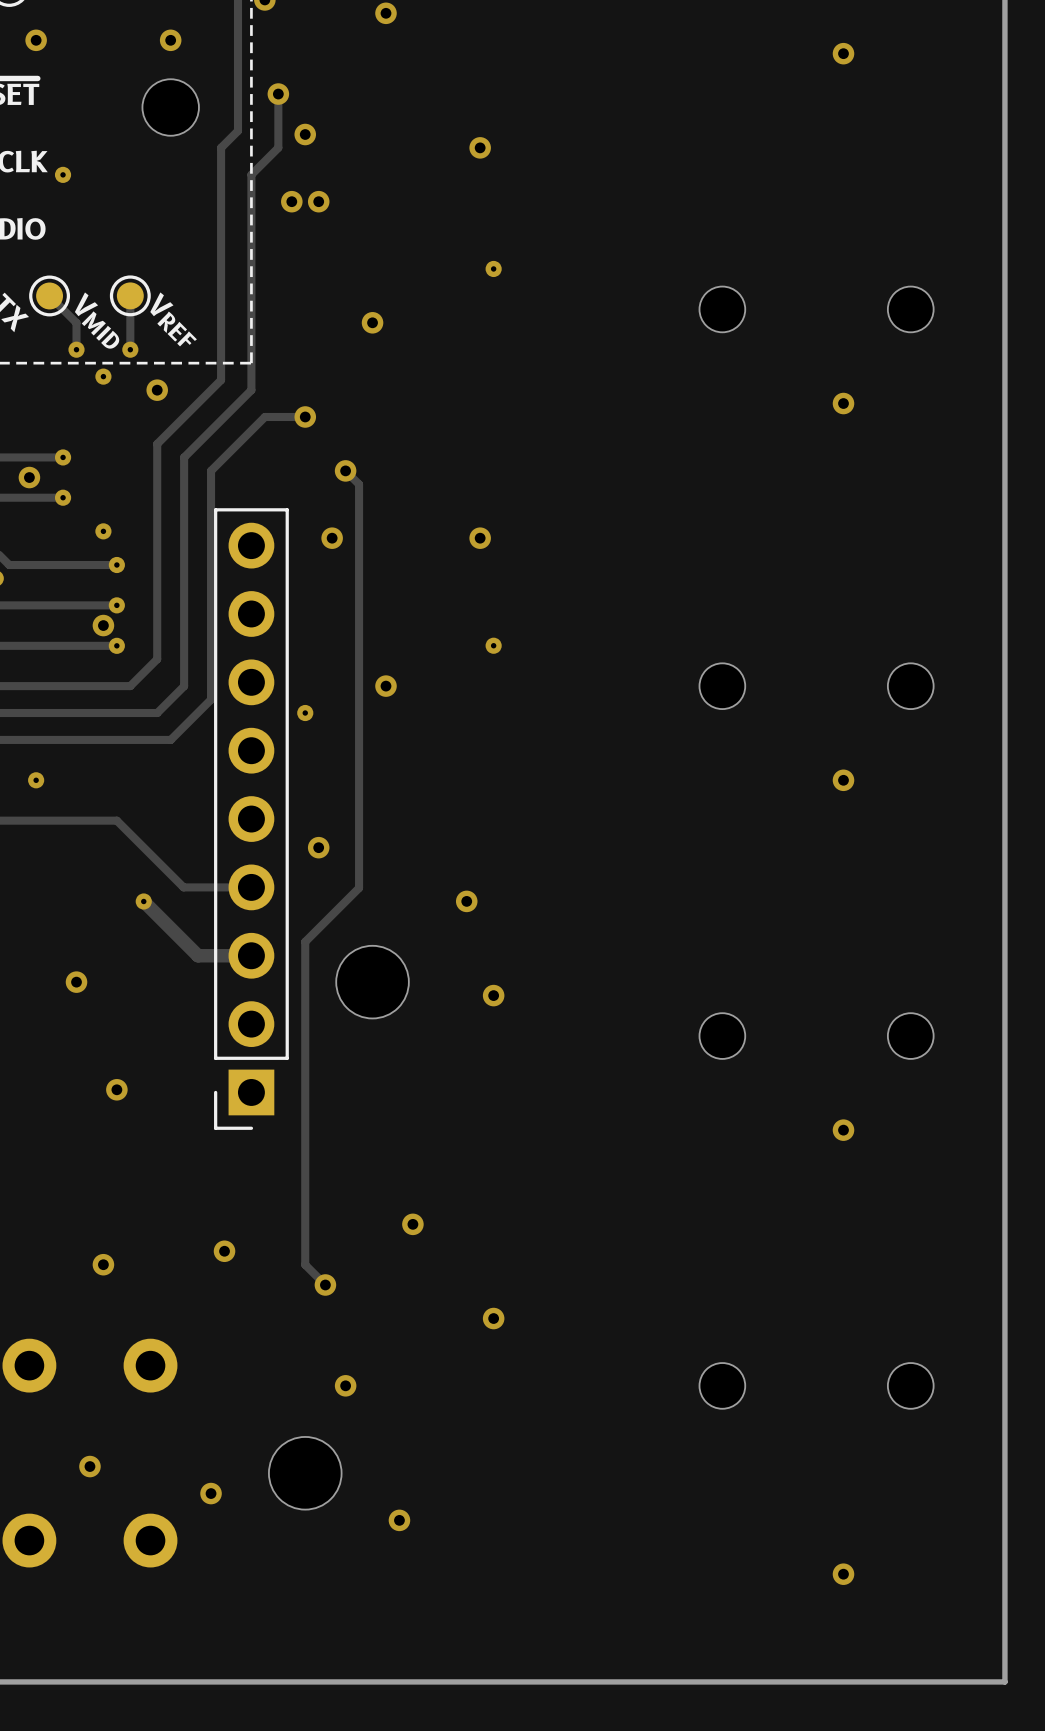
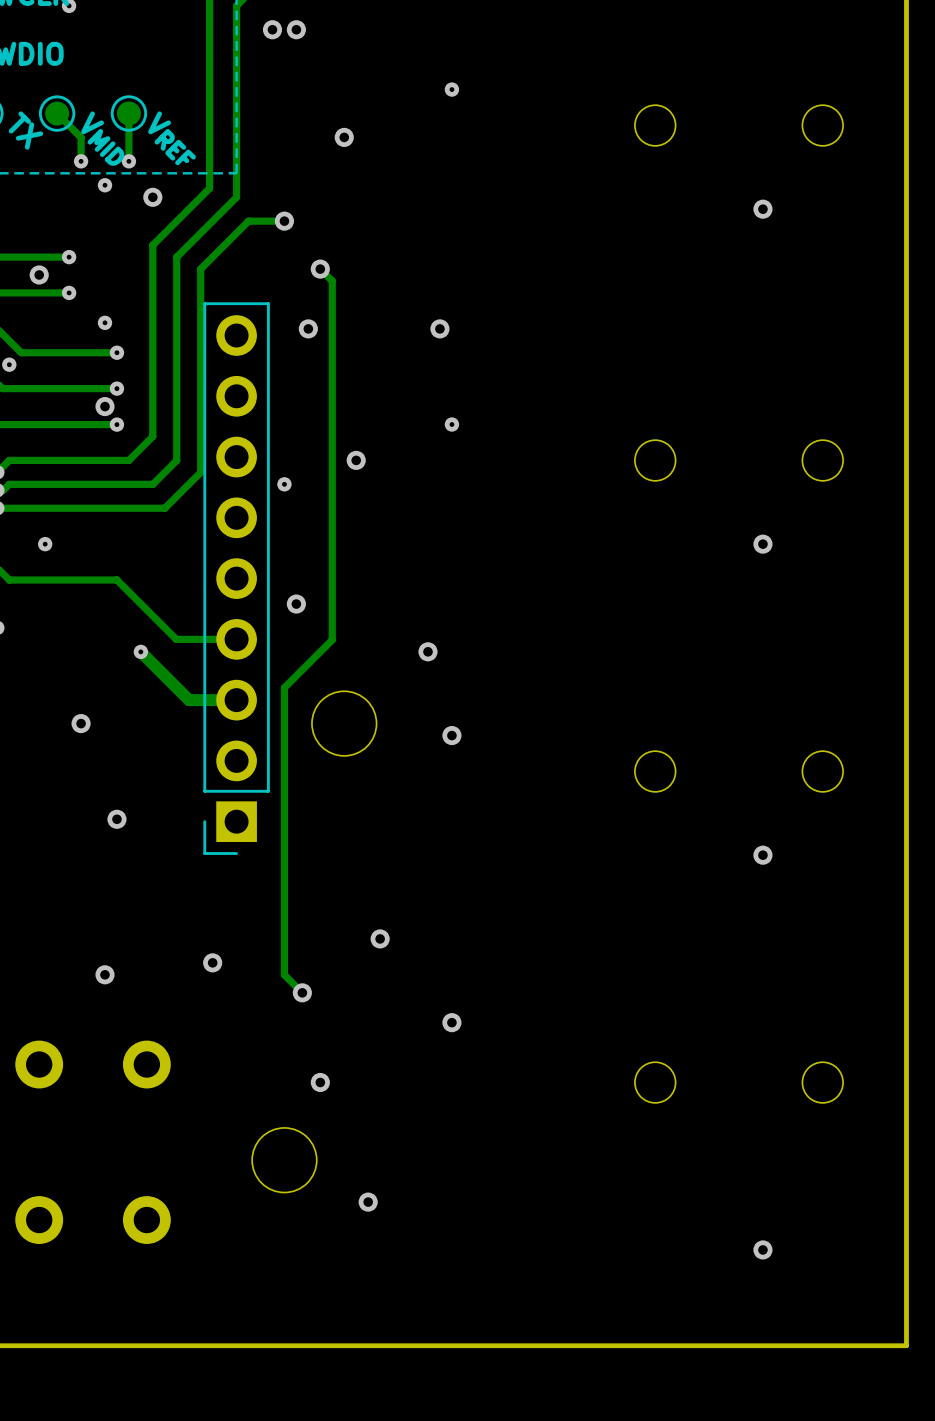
via: (89, 1466) -> none
via: (211, 1493) -> none

